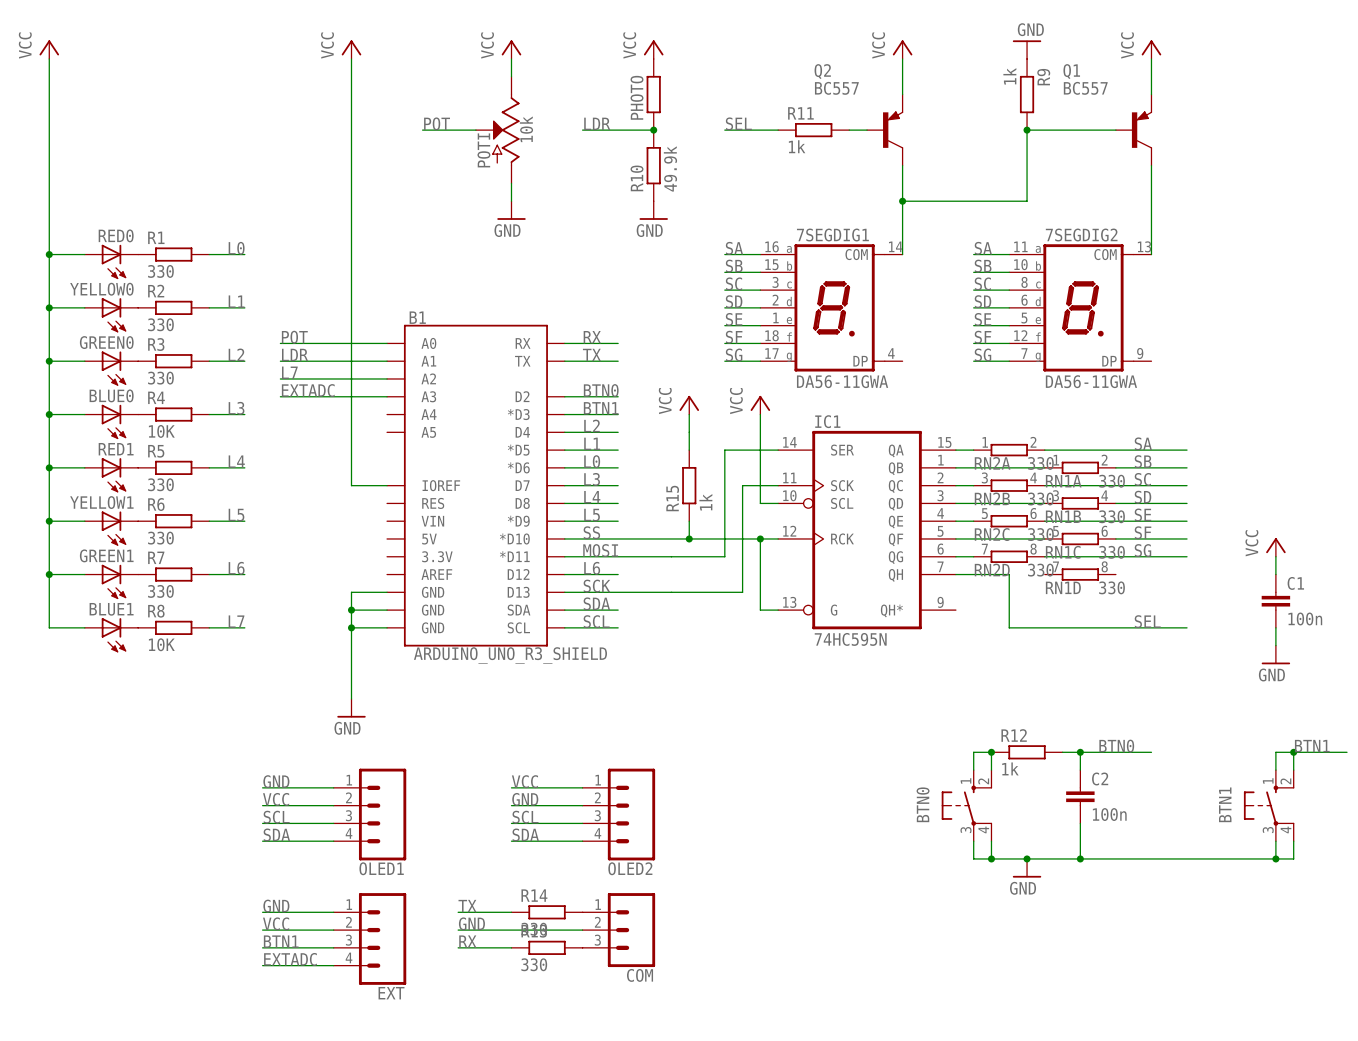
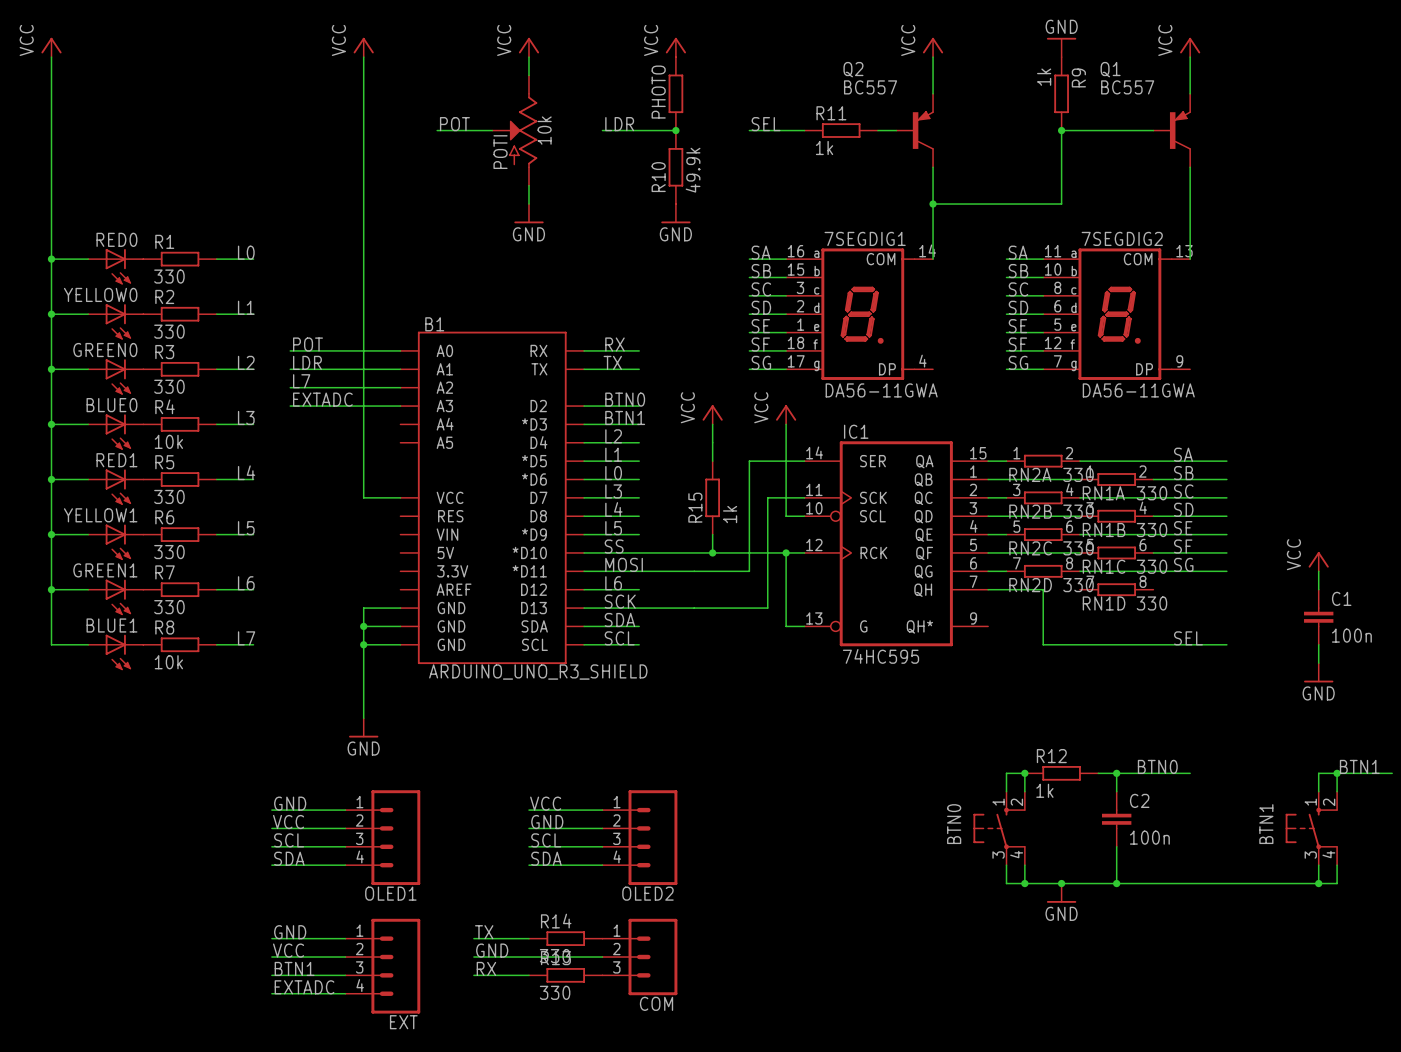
R4 value: 10K (161, 431) -> 10k (168, 441)
B1 pin name: IOREF (441, 485) -> VCC (450, 497)
IC1 value: 74HC595N (850, 639) -> 74HC595 (881, 656)
R8 value: 10K (161, 644) -> 10k (168, 662)

